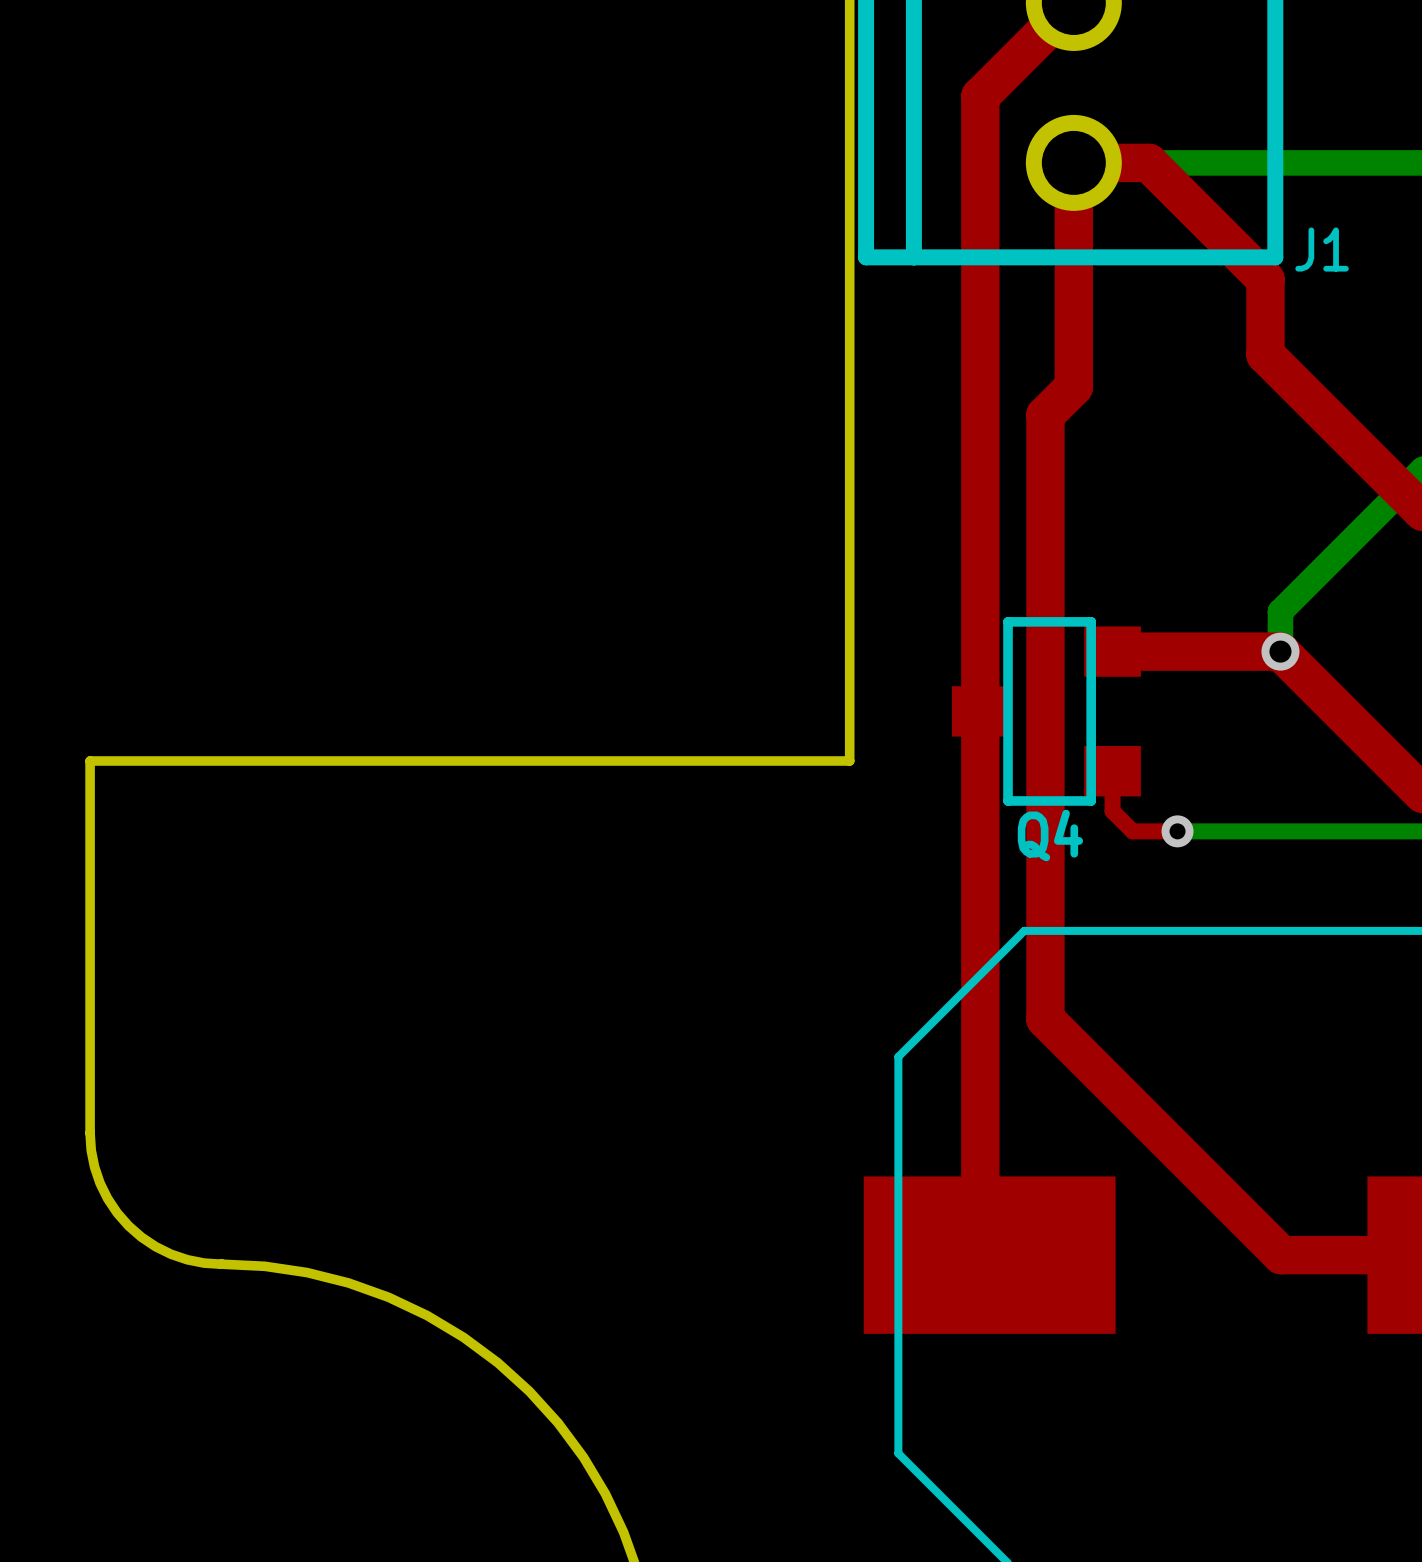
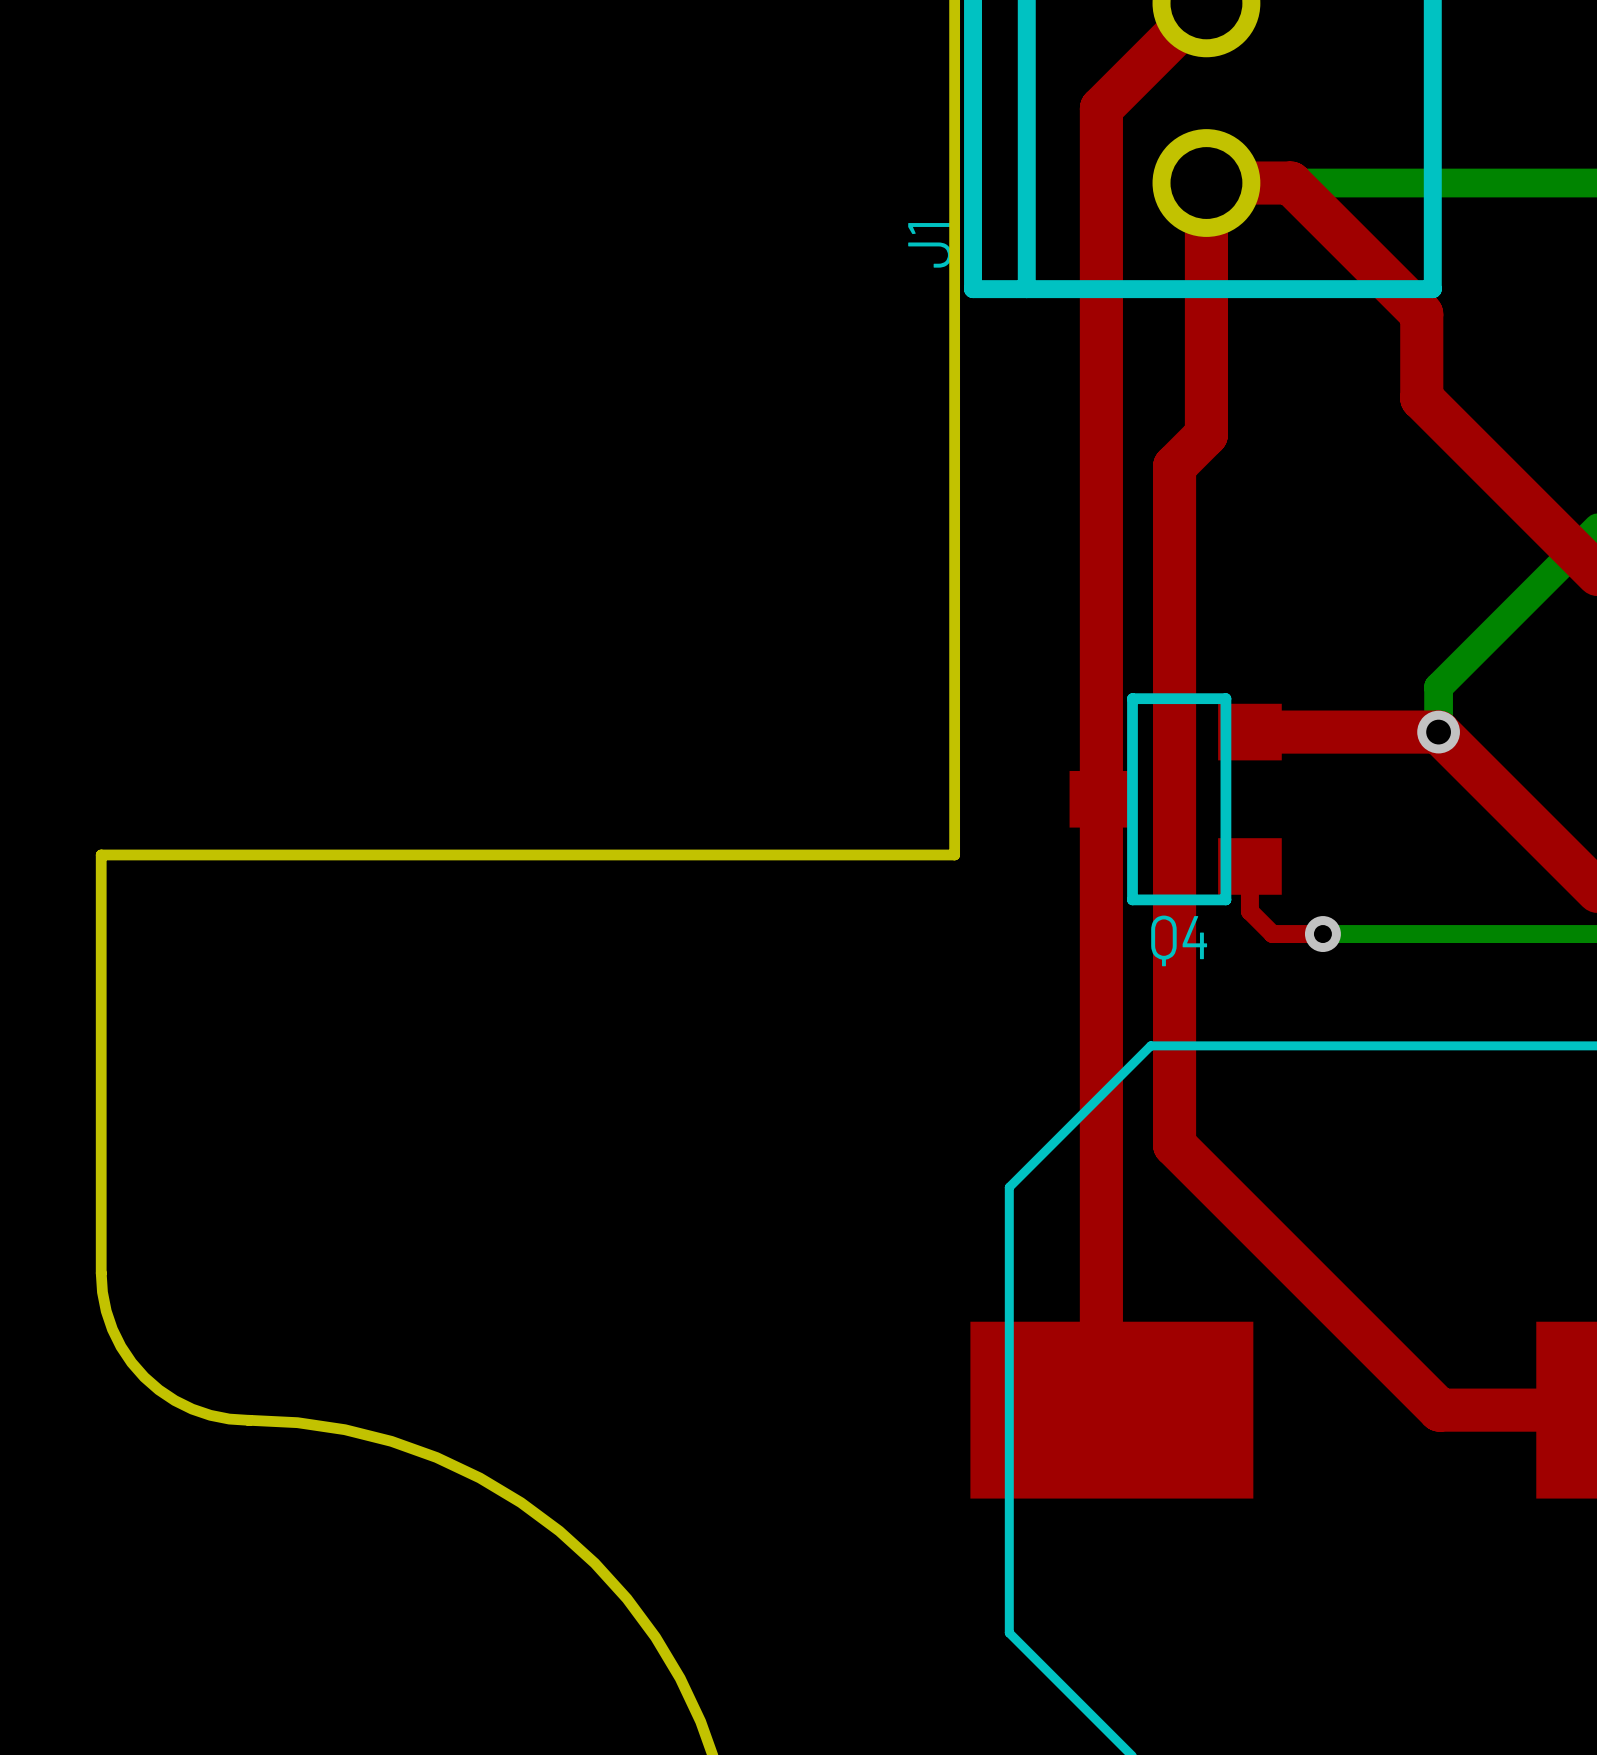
J1 name rotation: 0° (1322, 249) -> 90° counterclockwise (930, 245)
J1 name position: J1 (1322, 249) -> J1 (930, 245)

